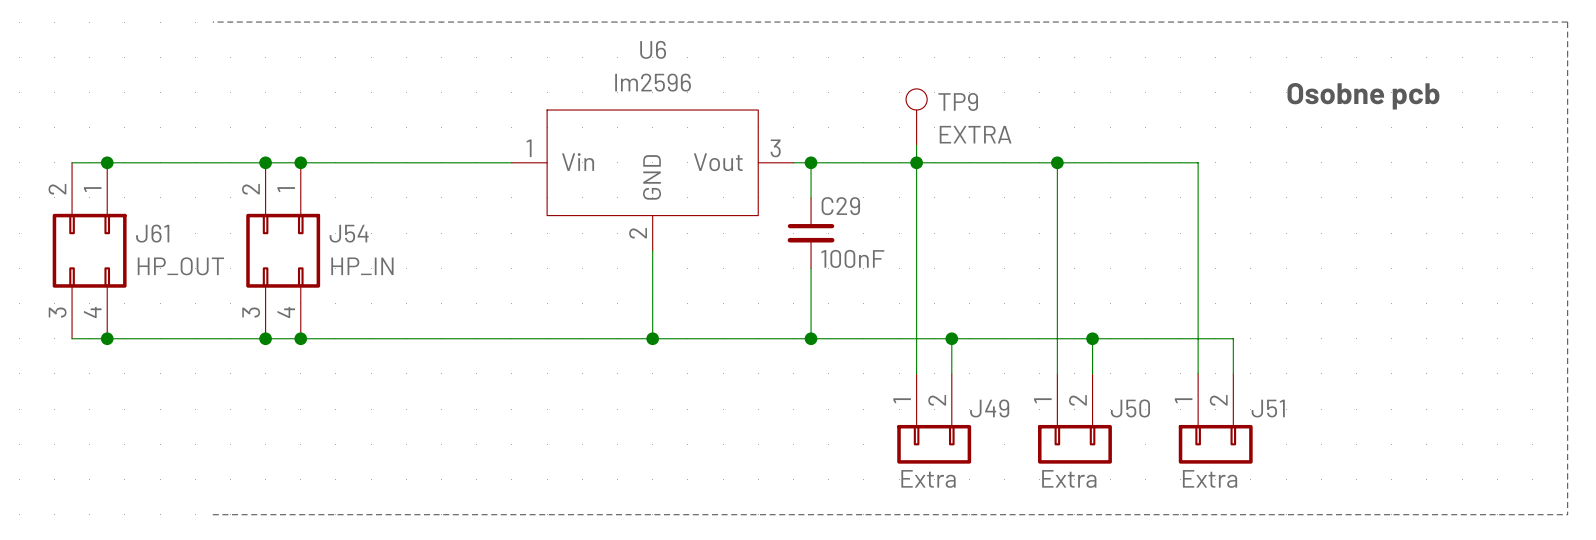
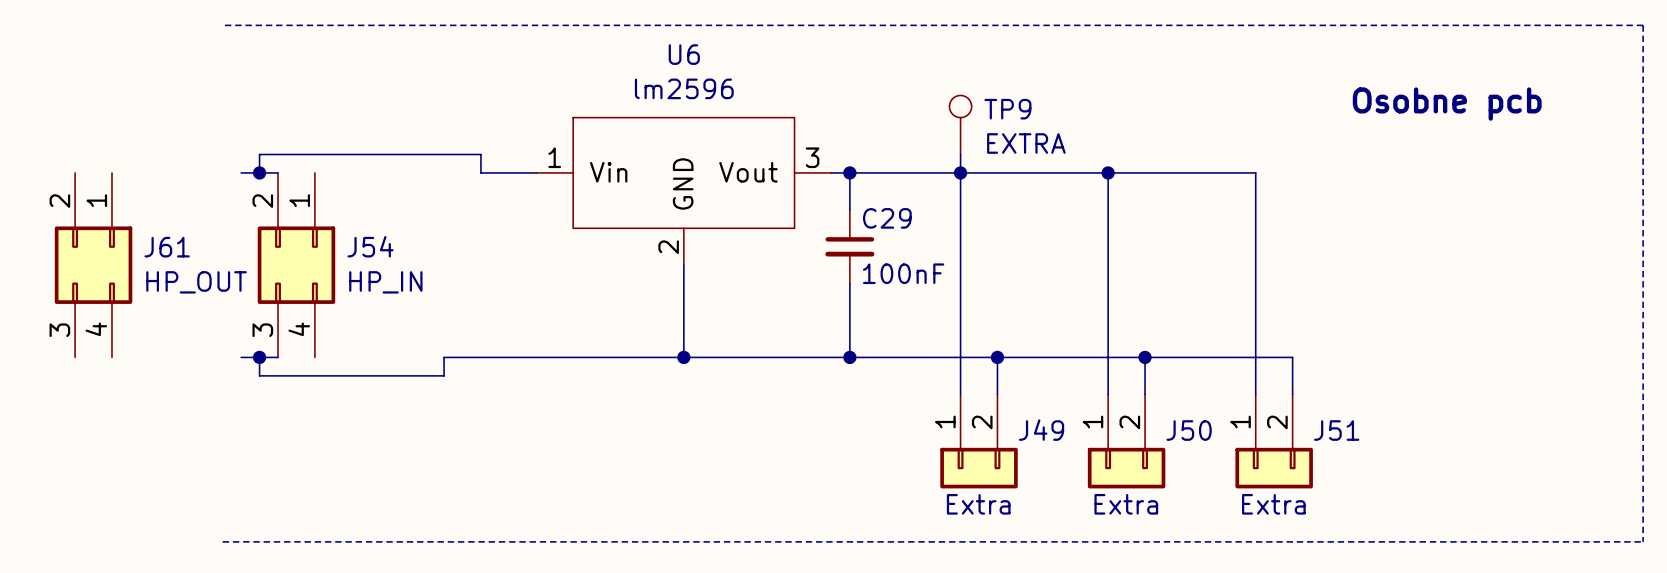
wire: (72, 162) (230, 162) -> none
junction: (107, 162) -> none
wire: (265, 162) (459, 162) -> (259, 172) (259, 154) (480, 154) (480, 172)
junction position: (265, 162) -> (259, 172)
junction: (300, 162) -> none
wire: (72, 338) (230, 338) -> none
junction: (107, 338) -> none
wire: (265, 338) (423, 338) -> (259, 357) (259, 375) (444, 375) (444, 357)
junction position: (265, 338) -> (259, 357)
junction: (300, 338) -> none

